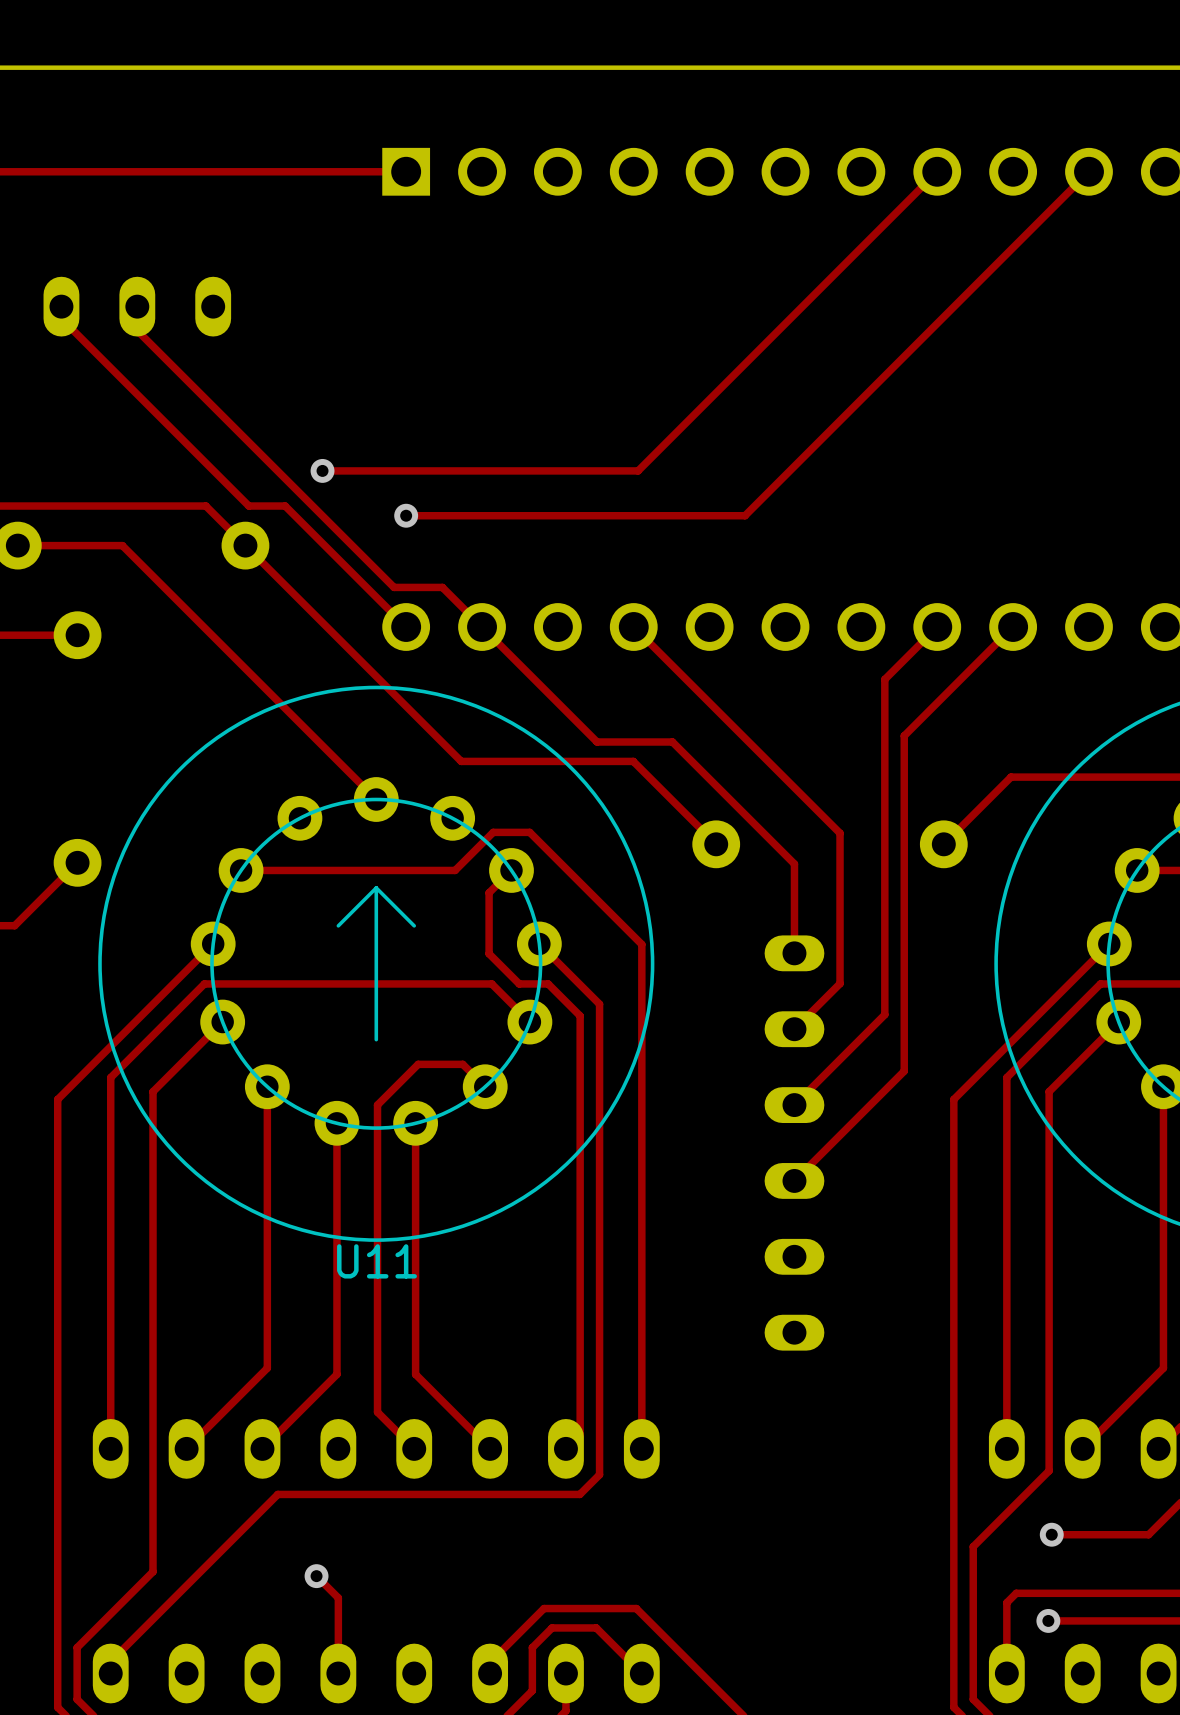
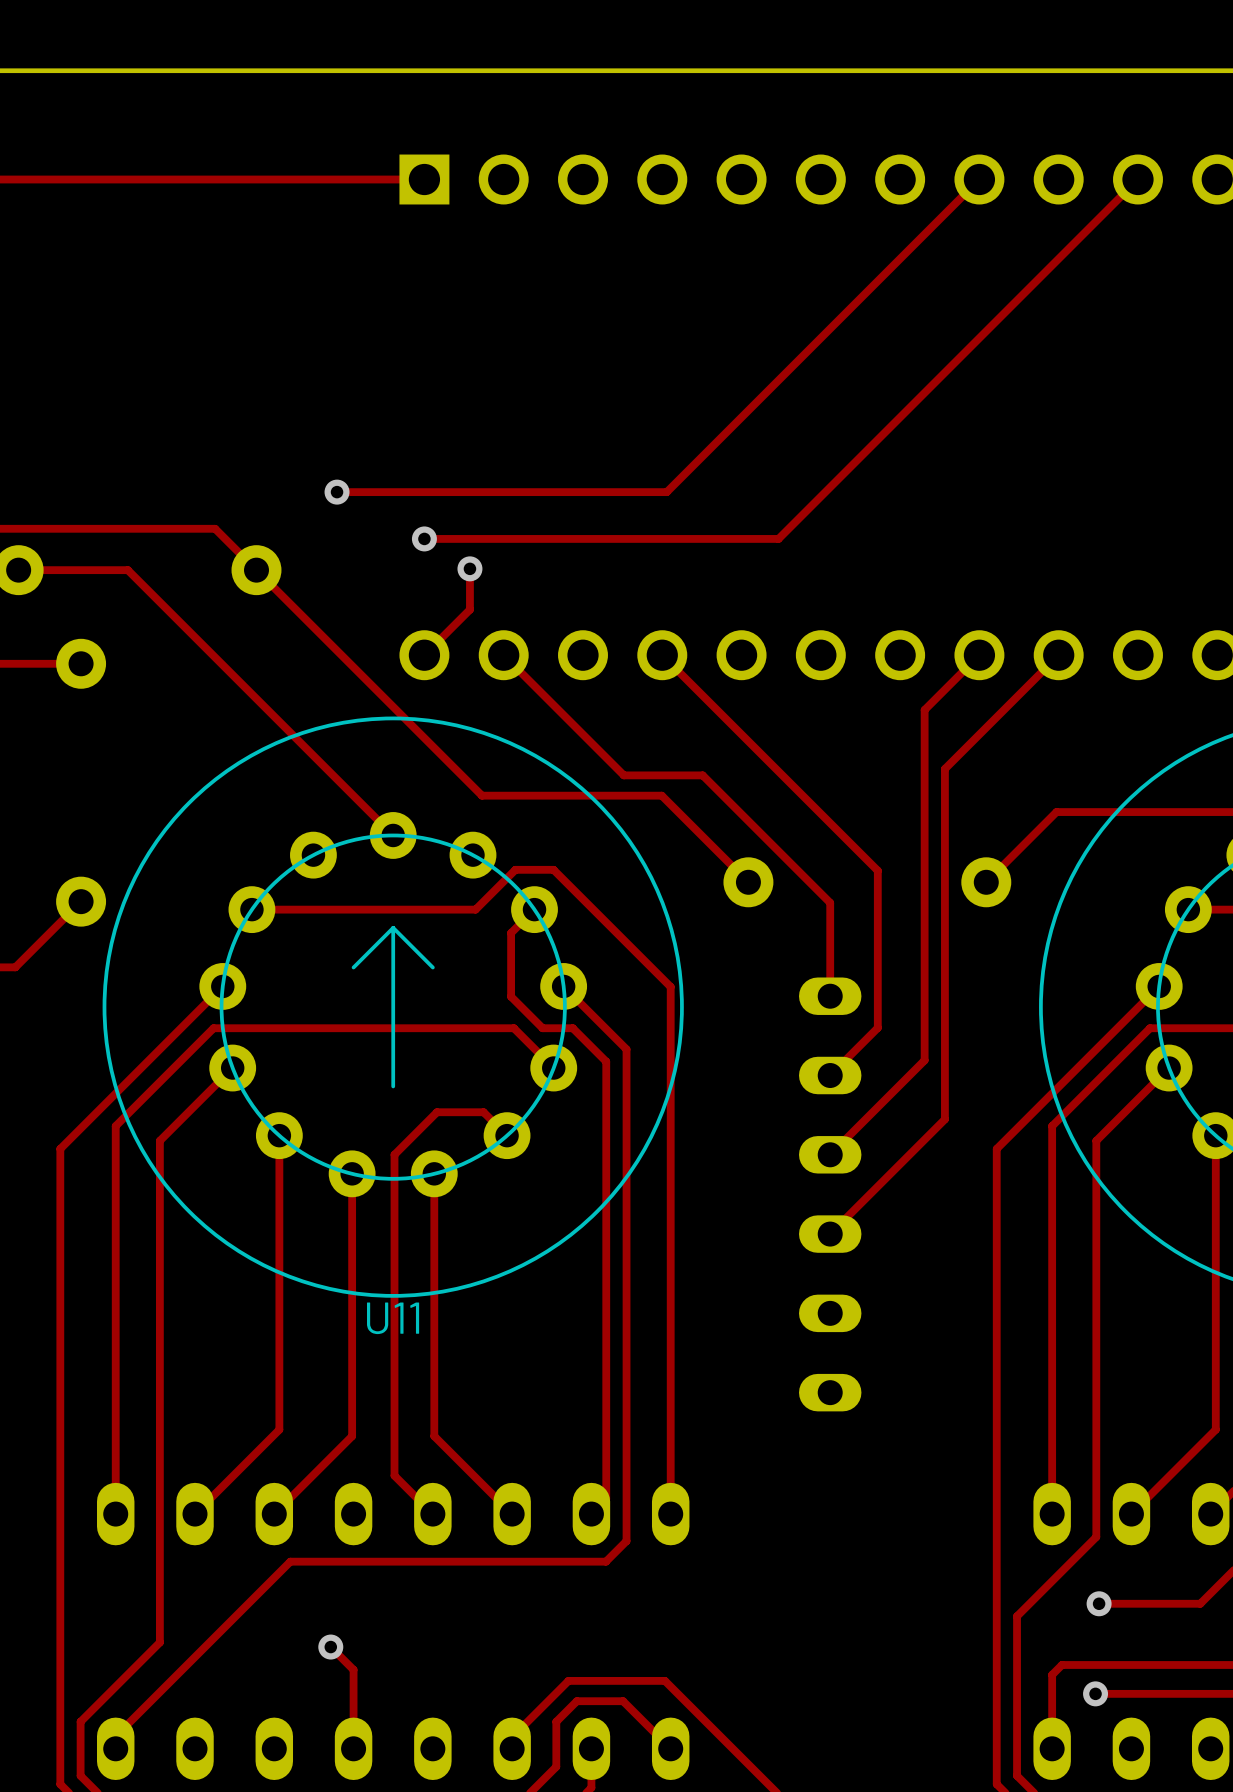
track: (61, 306) (61, 318) (248, 506) (285, 506) (406, 627) -> (469, 568) (469, 609) (424, 655)
track: (137, 306) (137, 330) (394, 587) (442, 587) (482, 627) -> none
part: (137, 306) -> none
via: none -> (469, 568)

